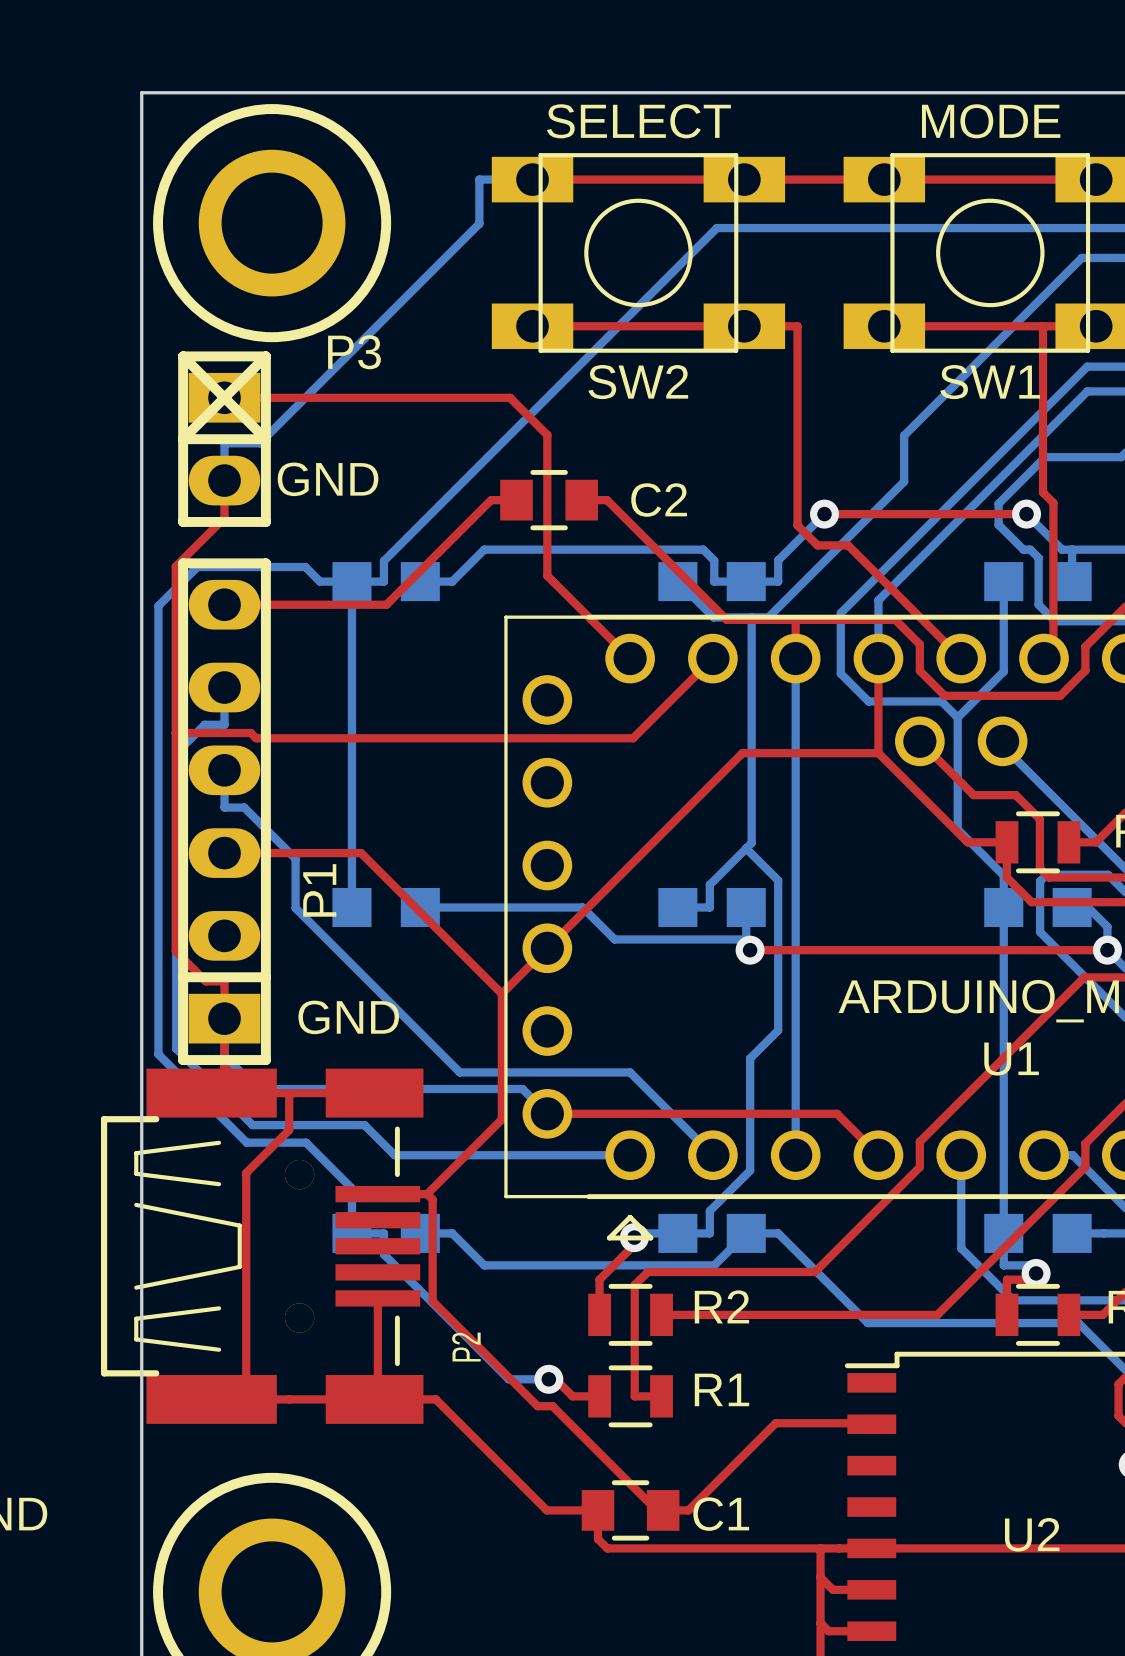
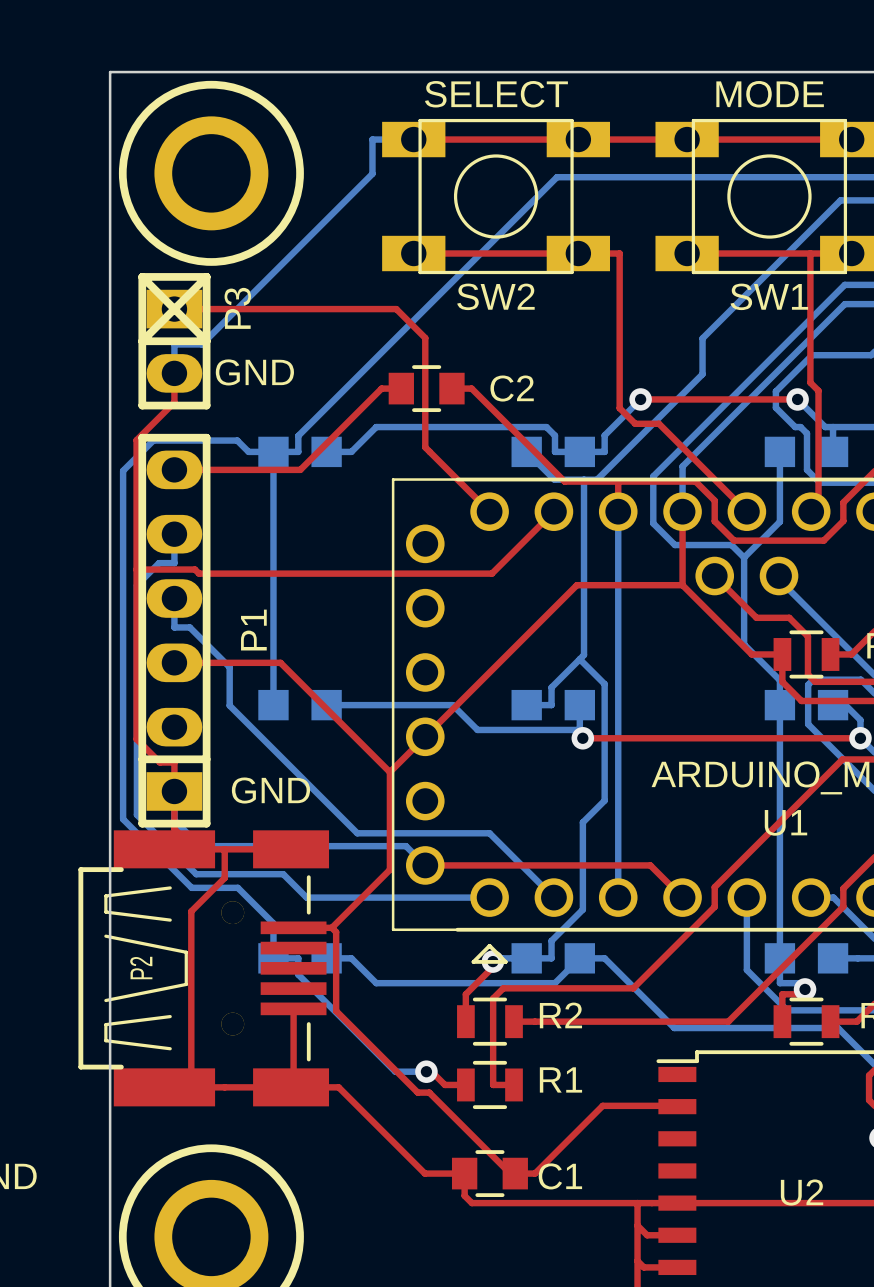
P3 name rotation: 0° (354, 352) -> 90° counterclockwise (237, 308)
P1 name position: P1 (319, 890) -> P1 (253, 630)
P2 name position: P2 (466, 1347) -> P2 (141, 968)

